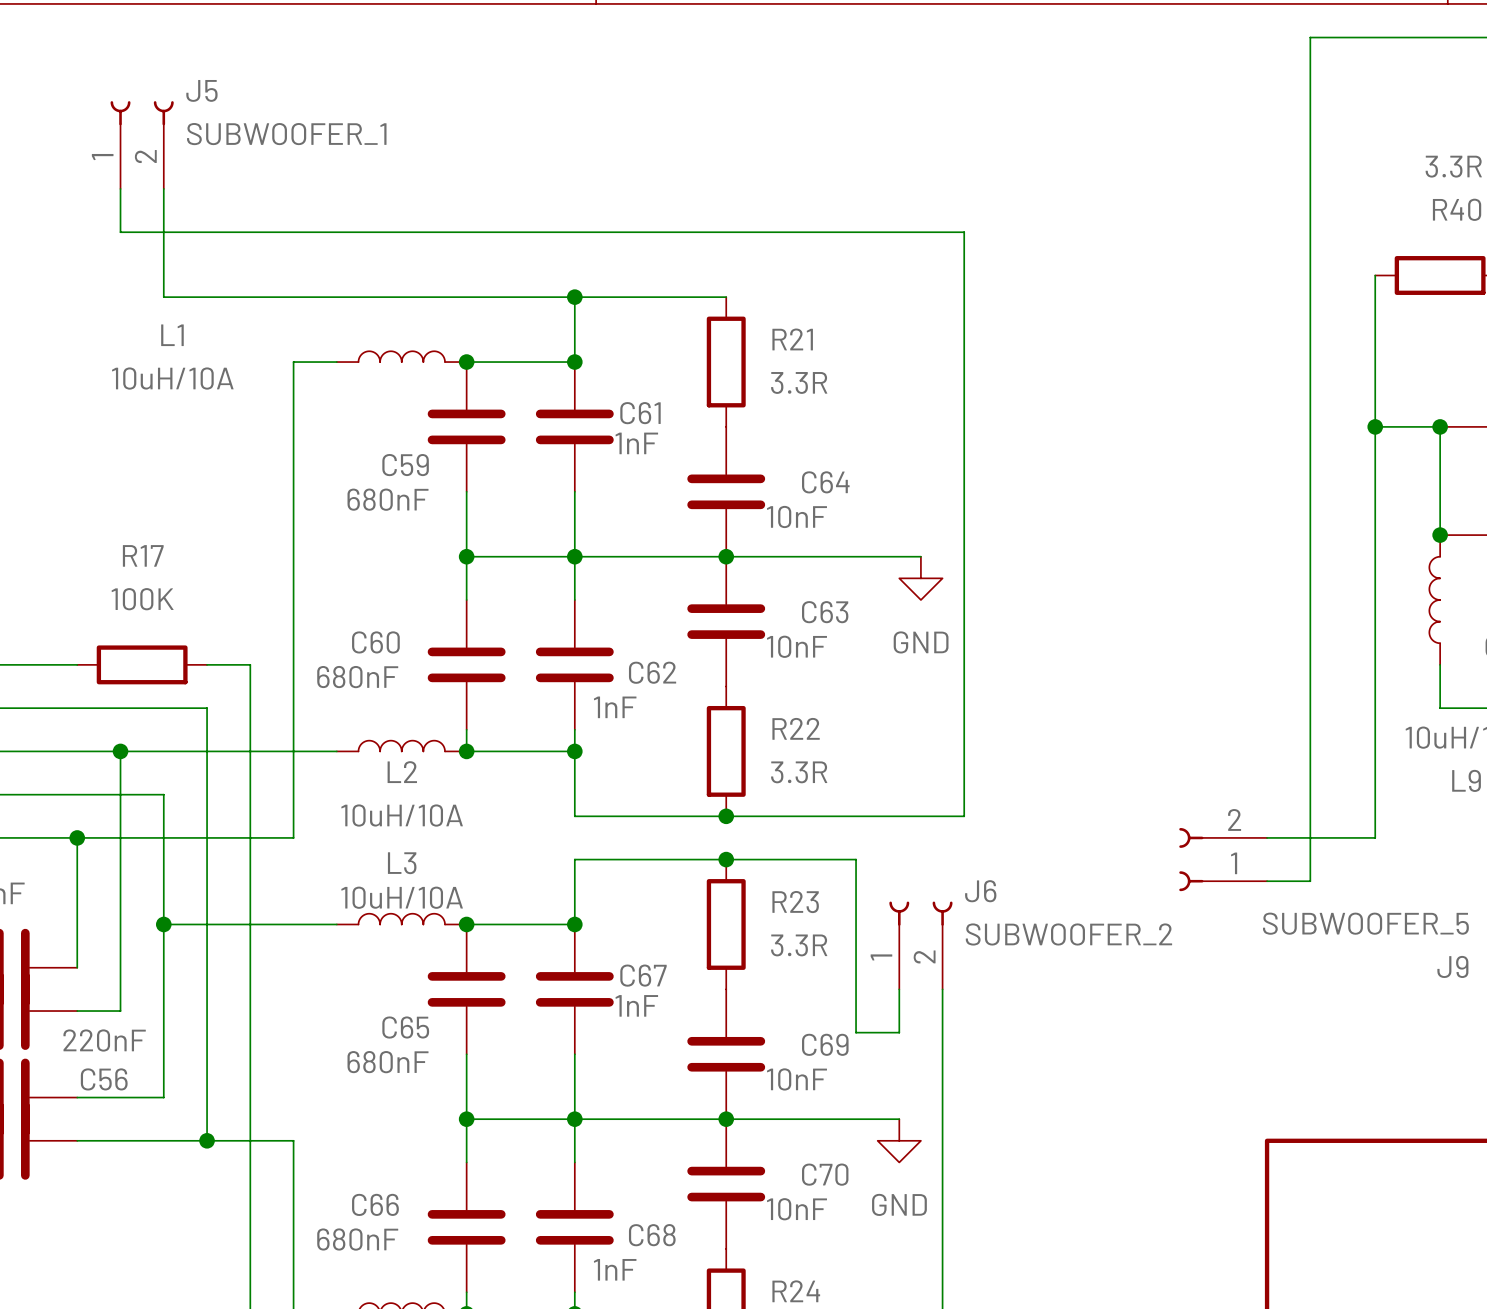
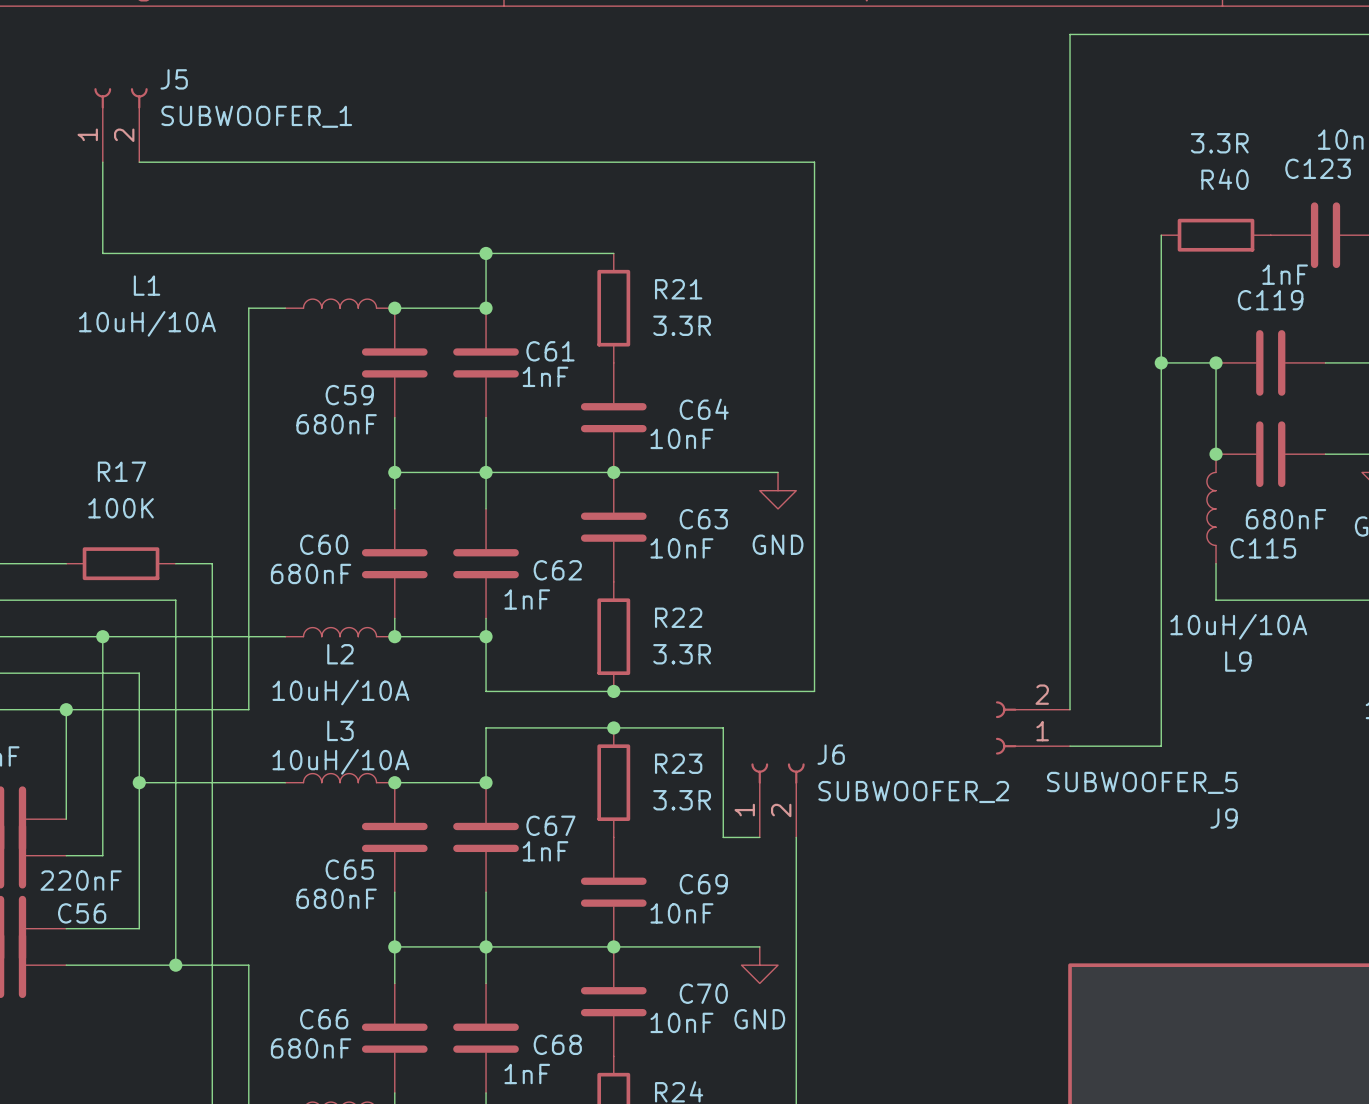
wire: (1310, 37) (1310, 881) -> (1106, 34) (1070, 34) (1070, 709)
wire: (163, 188) (163, 297) -> (102, 198) (102, 253) (139, 253)
wire: (120, 232) (964, 232) -> (139, 162) (814, 162) (814, 198)
wire: (1267, 837) (1375, 837) -> (1106, 746) (1161, 746) (1161, 709)
wire: (856, 989) (856, 1032) (899, 1032) (899, 989) -> (723, 837) (759, 837)

